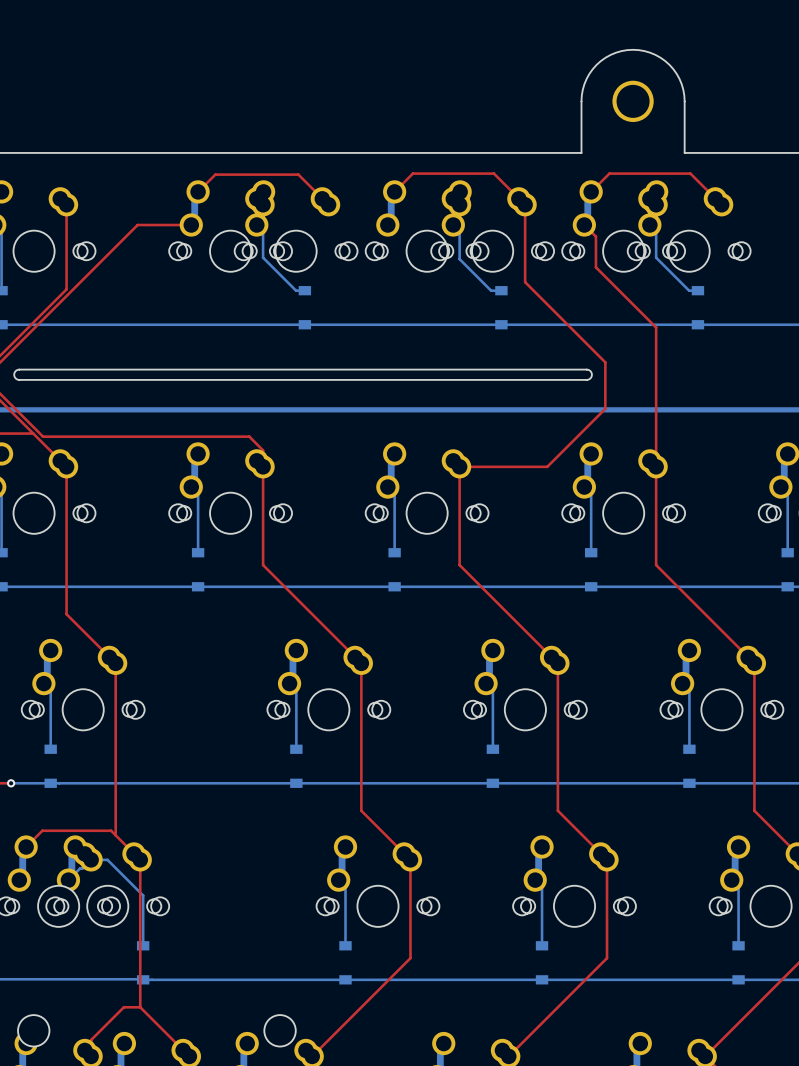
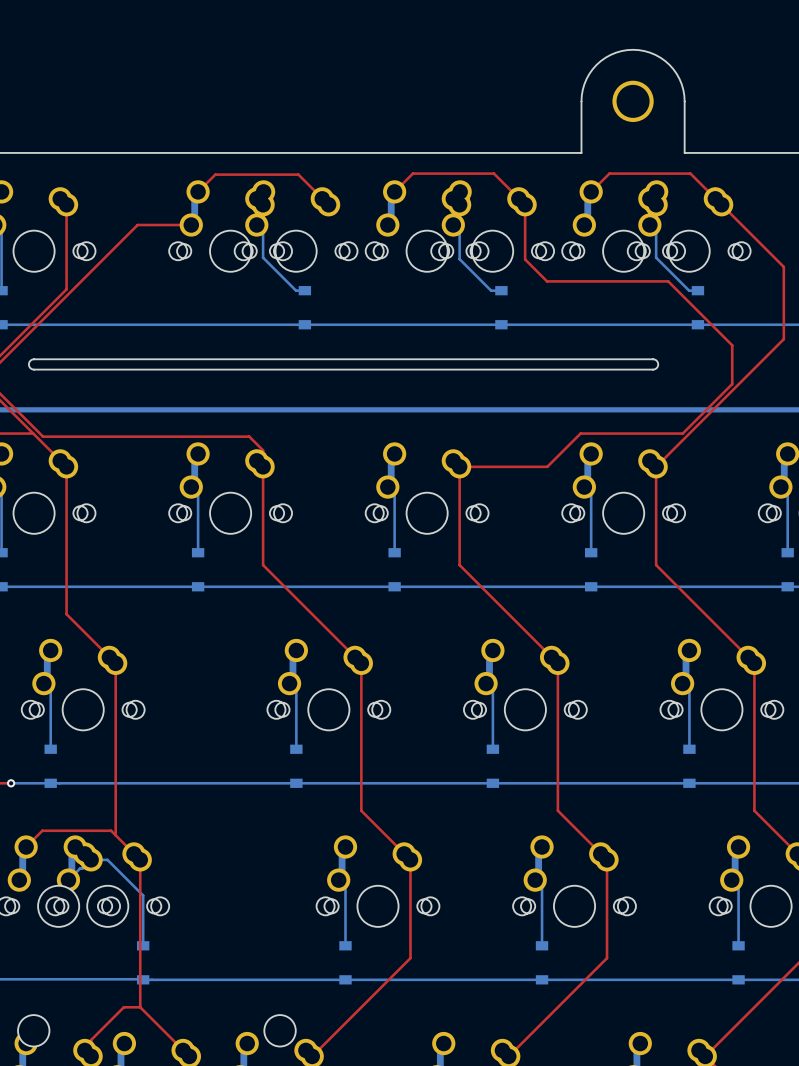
top track: (584, 225) (595, 236) (595, 267) (656, 327) (656, 466) -> (721, 204) (783, 266) (783, 339) (656, 466)
top track: (525, 259) (525, 282) (605, 362) (605, 408) (580, 433) -> (525, 259) (547, 281) (668, 281) (732, 345) (732, 384) (682, 433) (580, 433)
board edge: (34, 369) (17, 369) (14, 372) (14, 376) (19, 379) (586, 379) (590, 378) (591, 374) (590, 371) (586, 369) -> (34, 369) (30, 368) (28, 364) (30, 360) (34, 359) (653, 359) (658, 363) (657, 367) (653, 369) (586, 369)

